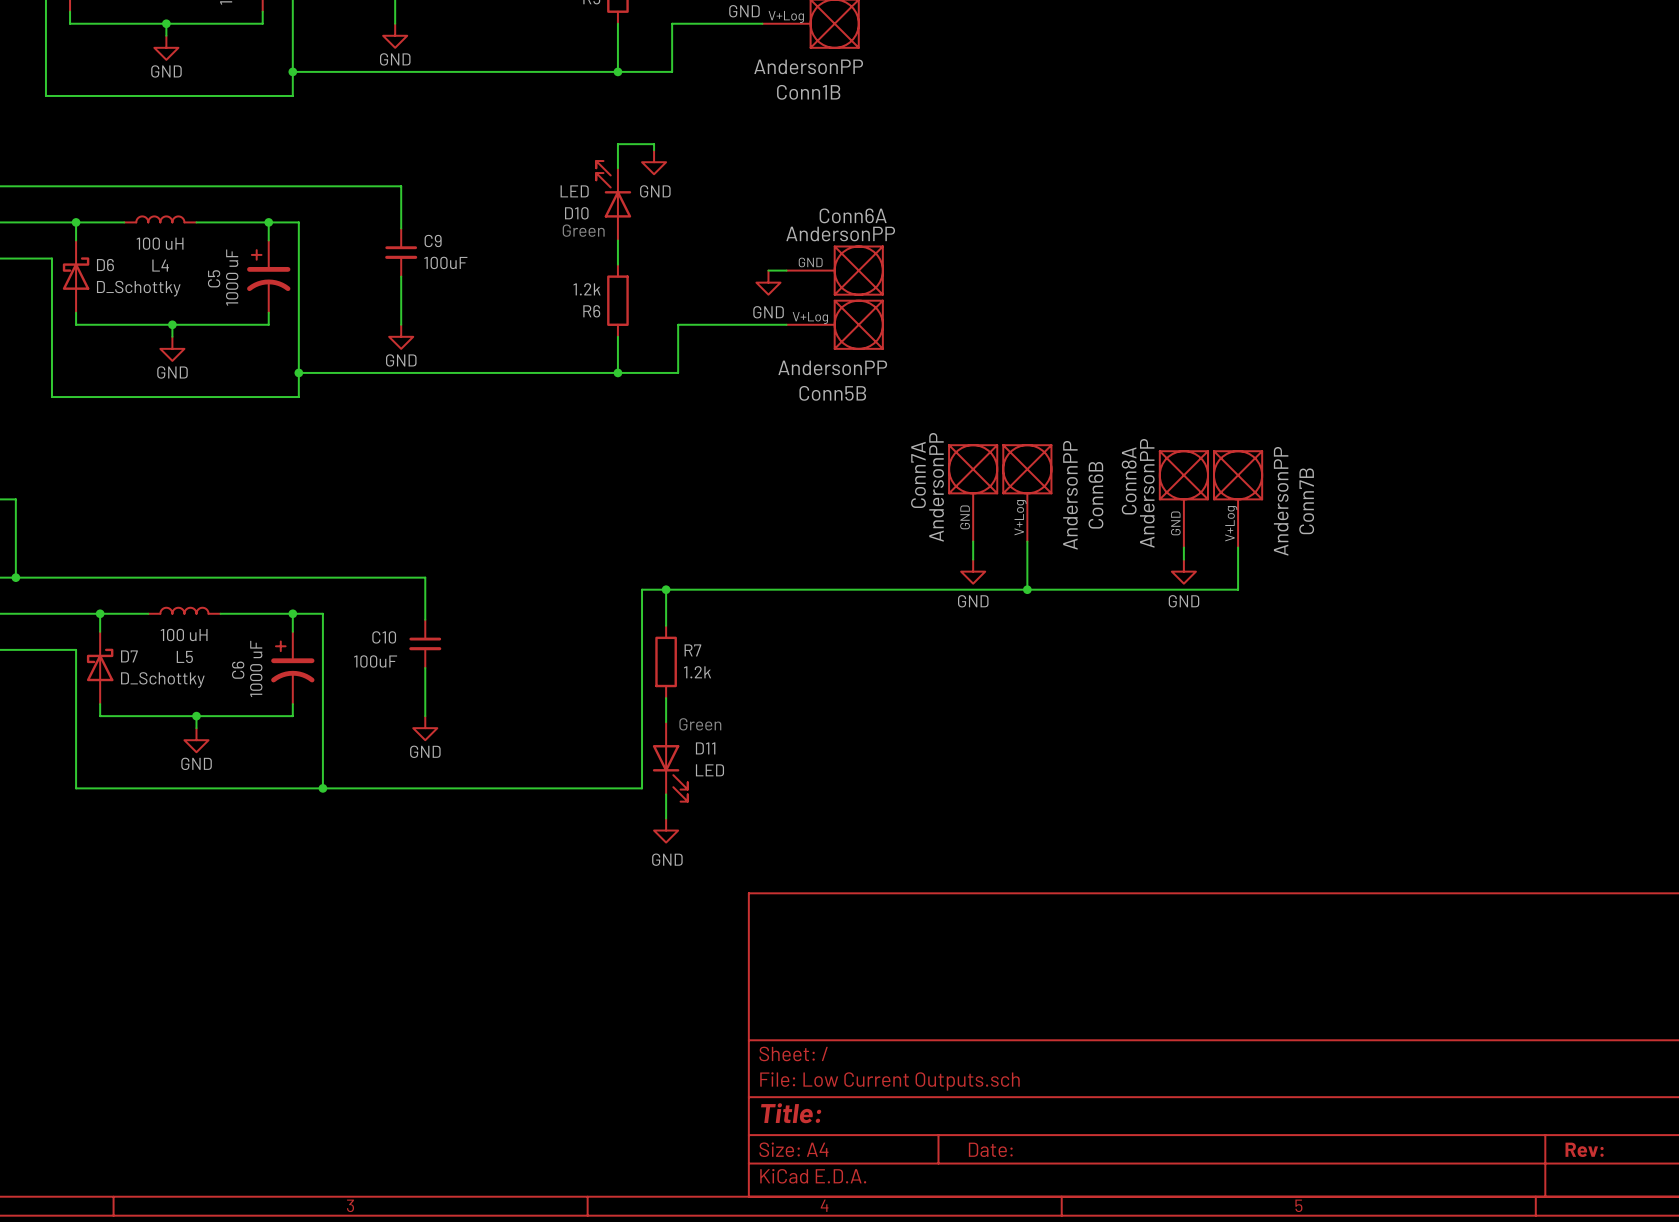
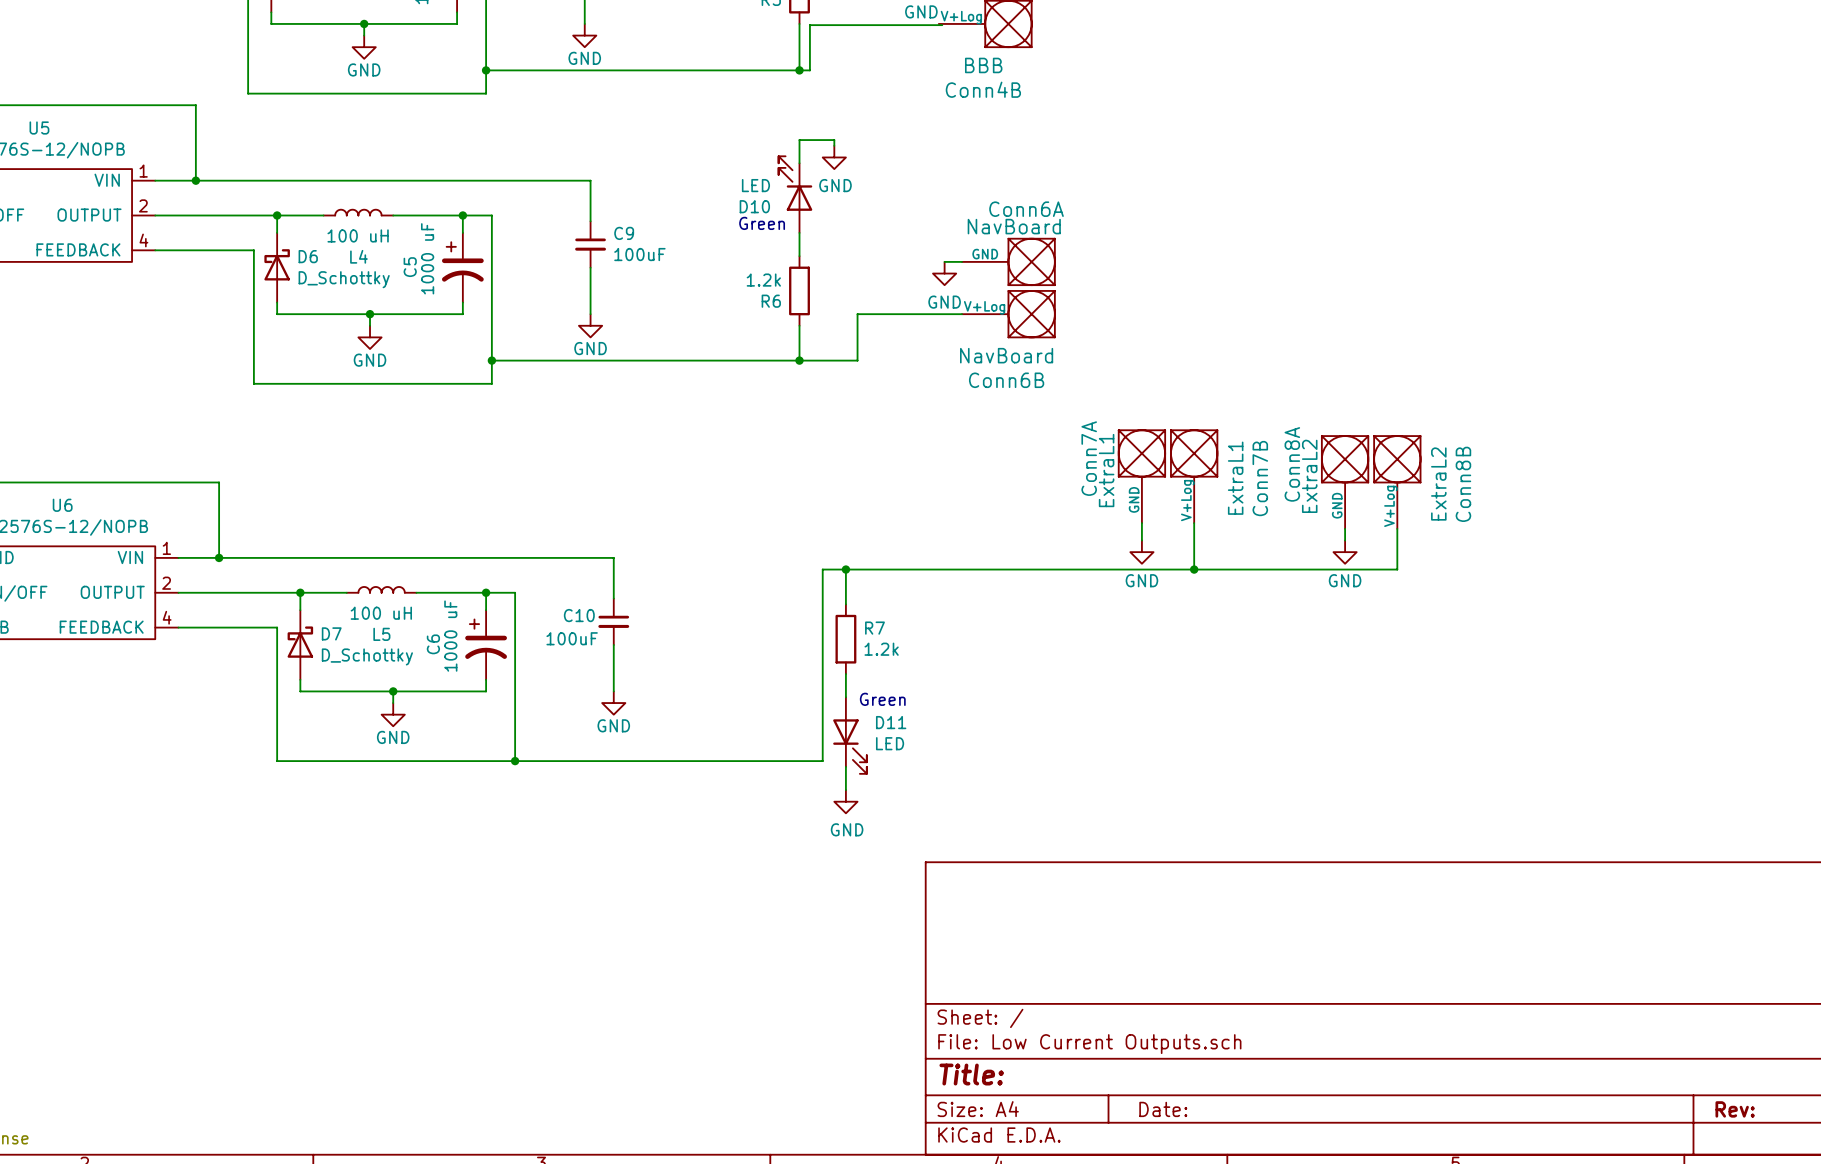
wire: (762, 23) (672, 23) (672, 71) (628, 71) -> (942, 25) (809, 25) (809, 70)
Conn1B value: AndersonPP (808, 66) -> BBB (983, 65)
Conn1B name: Conn1B (808, 92) -> Conn4B (983, 89)
Conn6A value: AndersonPP (840, 234) -> NavBoard (1014, 226)
Conn5B value: AndersonPP (832, 367) -> NavBoard (1006, 355)
Conn5B name: Conn5B (832, 393) -> Conn6B (1006, 380)
Conn7A value: AndersonPP (936, 487) -> ExtraL1 (1106, 470)
Conn8A value: AndersonPP (1147, 493) -> ExtraL2 (1309, 476)
Conn6B value: AndersonPP (1070, 495) -> ExtraL1 (1235, 478)
Conn6B name: Conn6B (1095, 495) -> Conn7B (1260, 478)
Conn7B value: AndersonPP (1281, 501) -> ExtraL2 (1438, 484)
Conn7B name: Conn7B (1306, 501) -> Conn8B (1463, 484)

